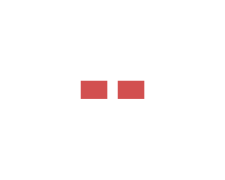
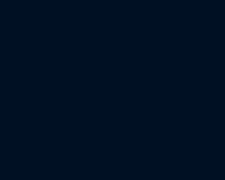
part: (112, 89) -> none

